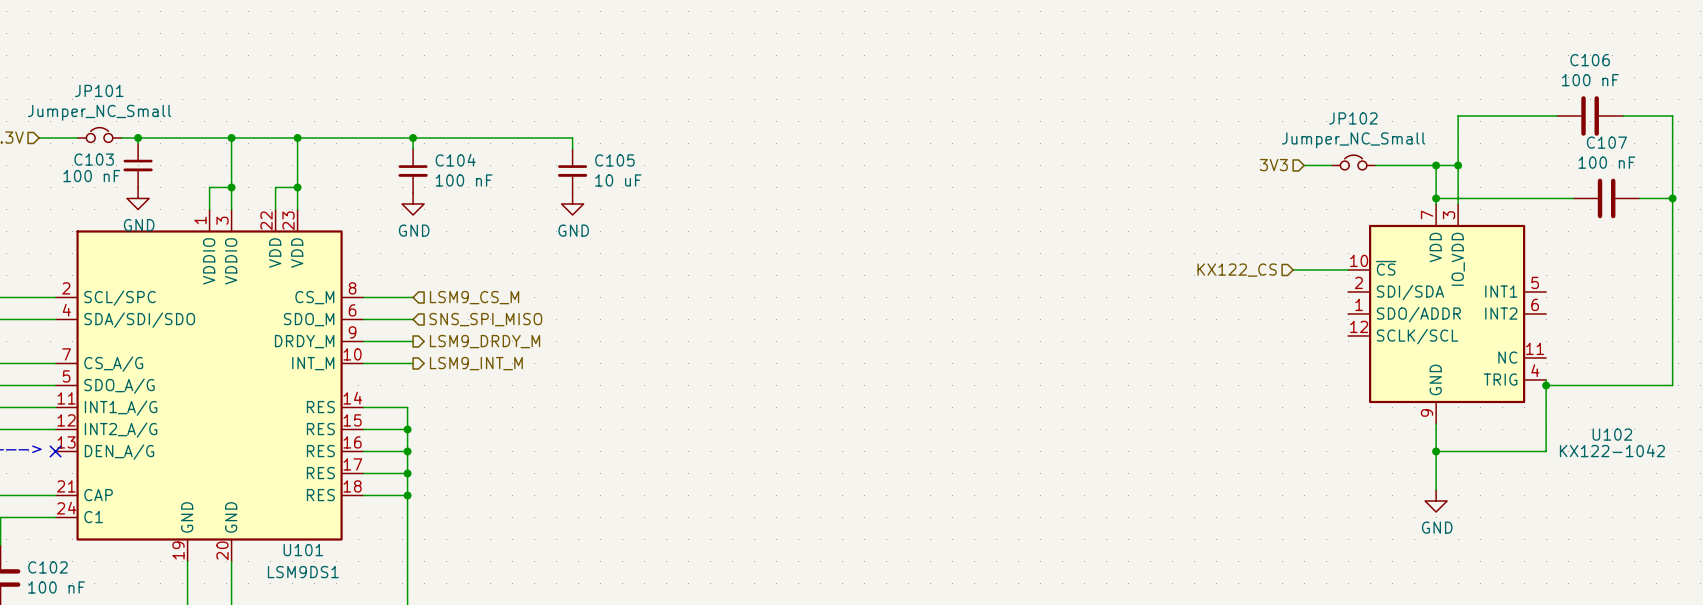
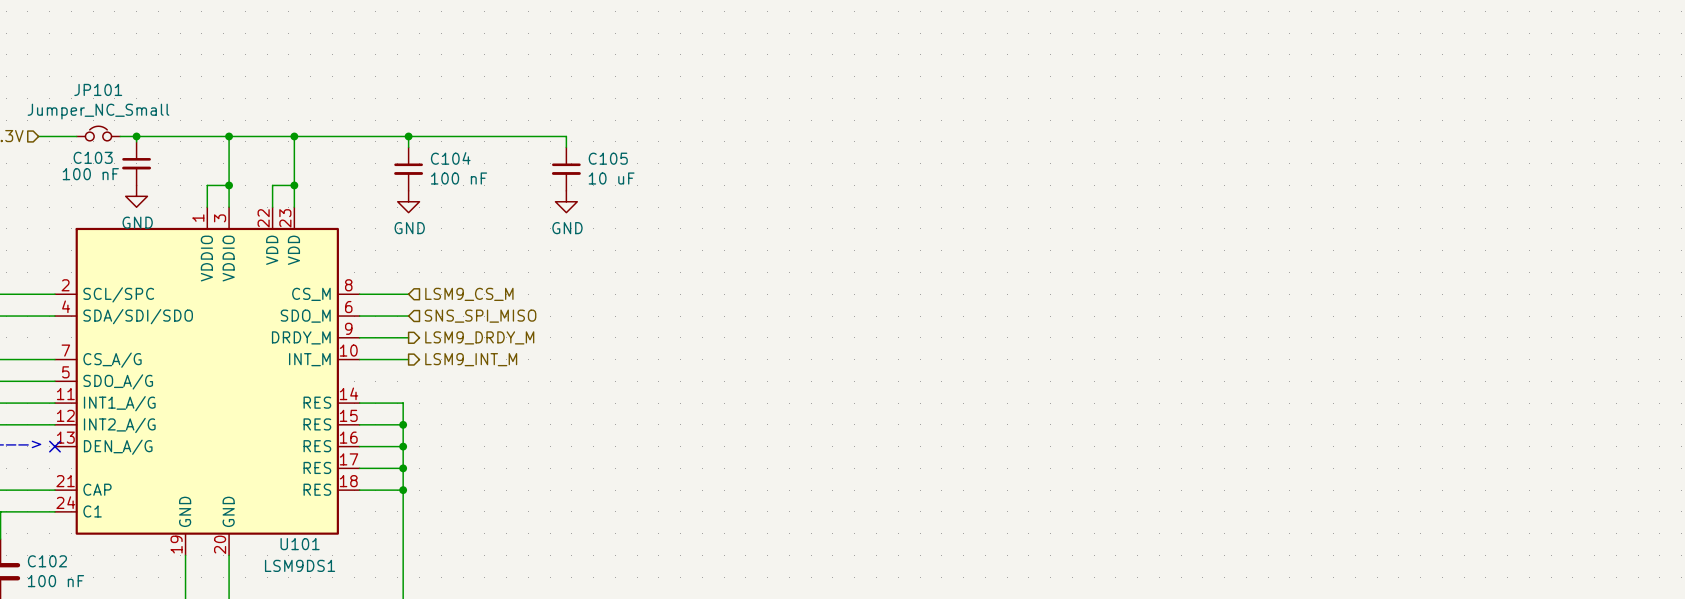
wire: (1557, 115) (1458, 115) (1458, 203) -> none
C106: 100 nF (1590, 115) -> none
wire: (1623, 115) (1672, 115) (1672, 385) (1546, 385) -> none
JP102: Jumper_NC_Small (1353, 162) -> none
hierarchical label: 3V3 (1273, 165) -> none
wire: (1304, 165) (1331, 165) -> none
wire: (1375, 165) (1458, 165) -> none
wire: (1436, 165) (1436, 203) -> none
junction: (1436, 165) -> none
junction: (1458, 165) -> none
wire: (1436, 198) (1573, 198) -> none
junction: (1436, 198) -> none
C107: 100 nF (1606, 198) -> none
wire: (1639, 198) (1672, 198) -> none
junction: (1672, 198) -> none
wire: (1293, 269) (1348, 269) -> none
hierarchical label: KX122_CS (1237, 270) -> none
U102: KX122-1042 (1447, 313) -> none
wire: (1546, 379) (1546, 451) (1436, 451) -> none
junction: (1546, 385) -> none
wire: (1436, 423) (1436, 489) -> none
junction: (1436, 451) -> none
power symbol: GND (1436, 500) -> none

